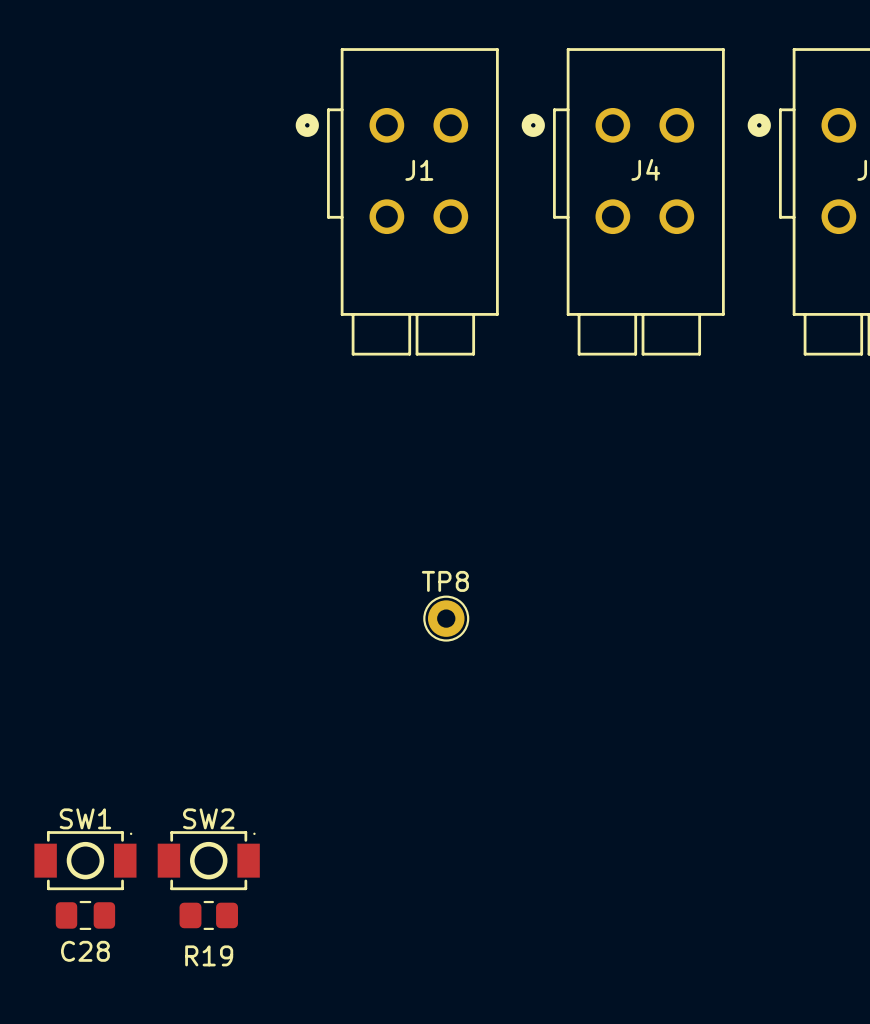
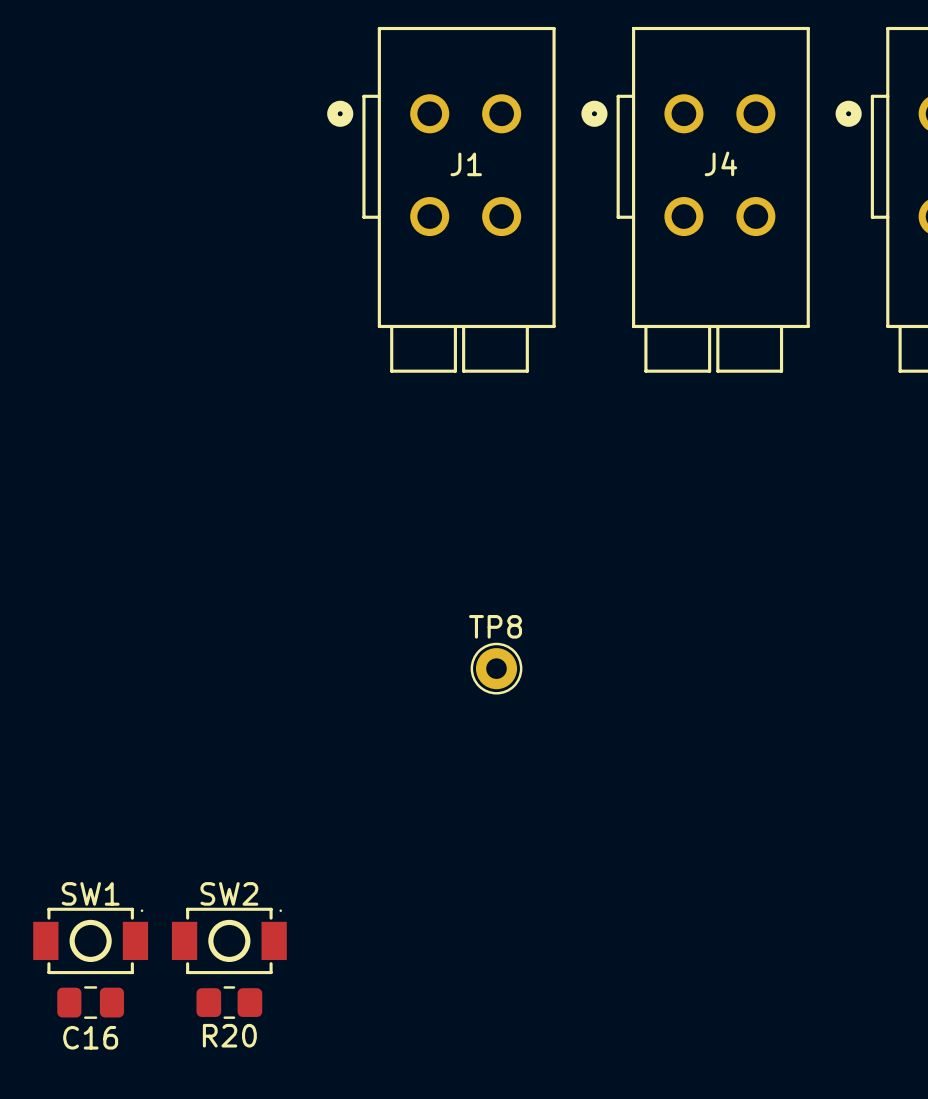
C28 name: C28 (85, 951) -> C16 (90, 1037)
R19 name: R19 (209, 955) -> R20 (229, 1035)

